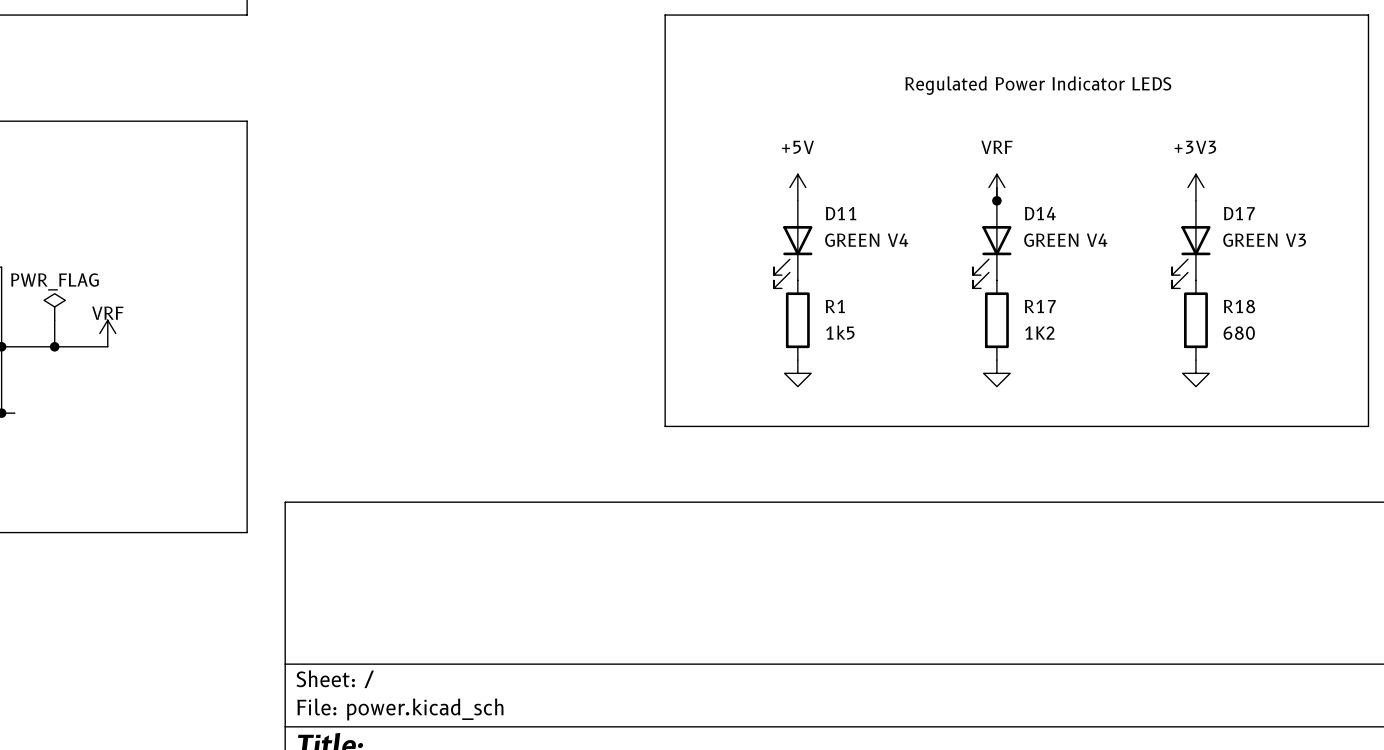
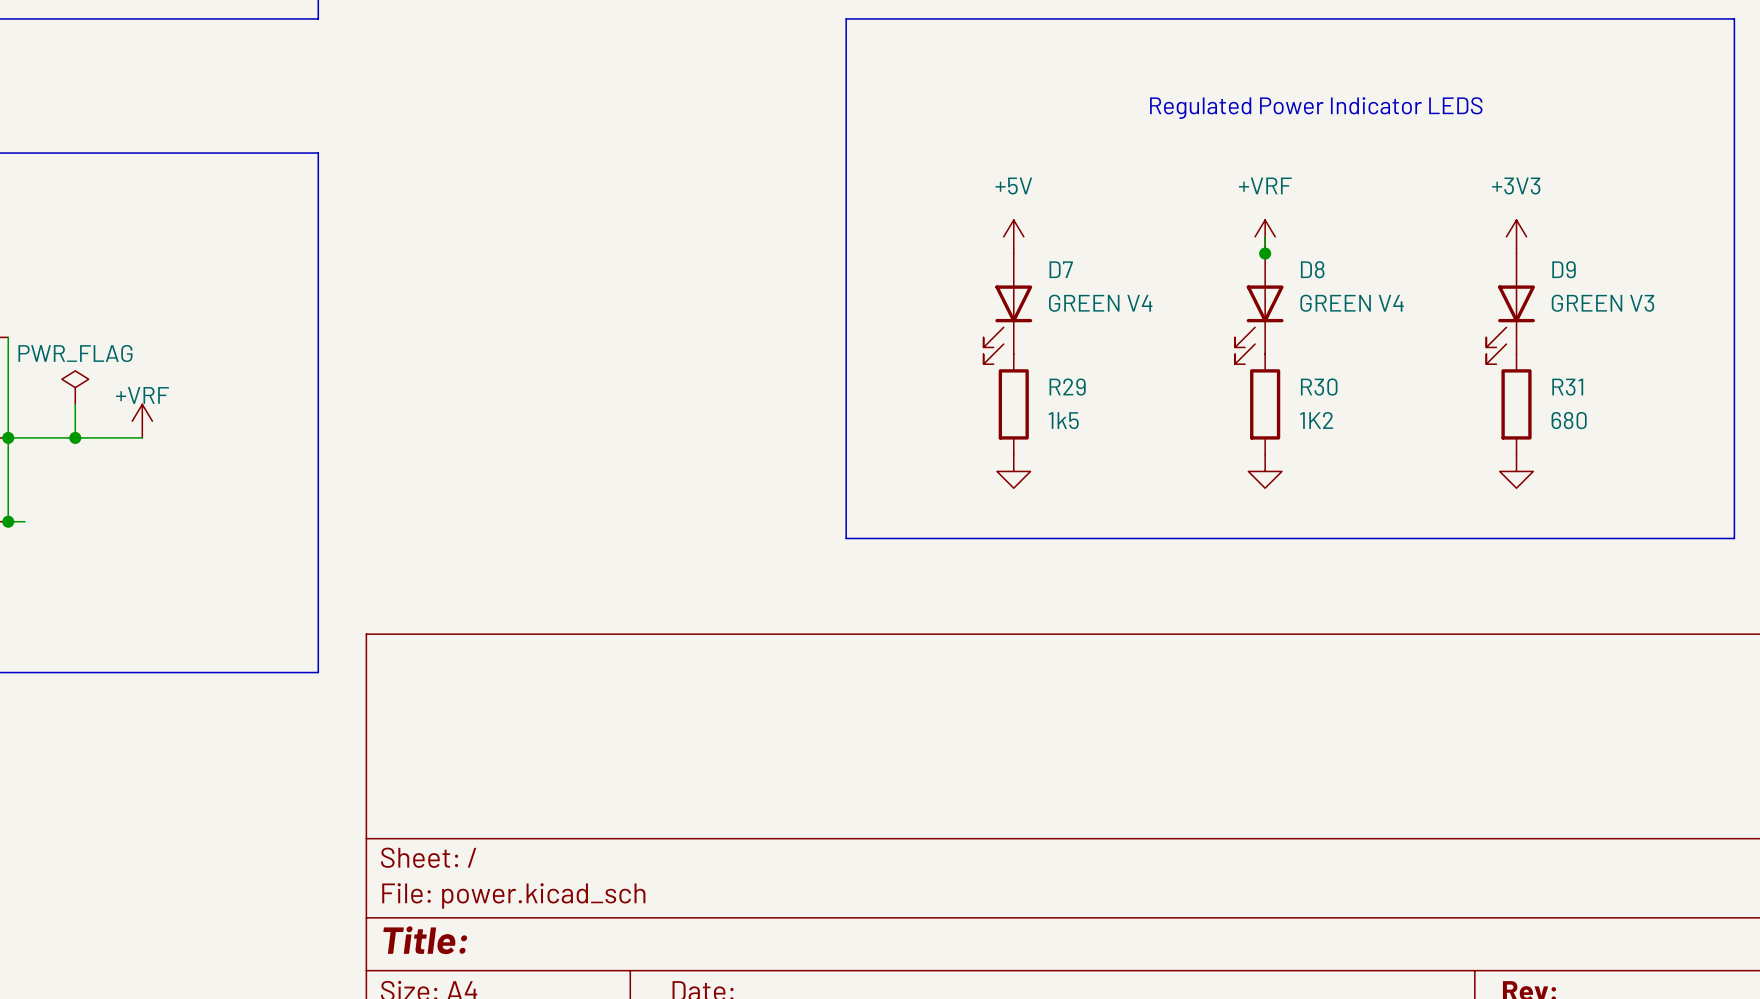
power symbol: VRF (996, 187) -> +VRF (1265, 236)
D11 name: D11 (841, 213) -> D7 (1061, 269)
D14 name: D14 (1040, 213) -> D8 (1312, 269)
D17 name: D17 (1239, 213) -> D9 (1564, 269)
R1 name: R1 (835, 306) -> R29 (1067, 387)
R17 name: R17 (1040, 306) -> R30 (1319, 387)
R18 name: R18 (1239, 306) -> R31 (1567, 387)
power symbol: VRF (107, 333) -> +VRF (142, 421)

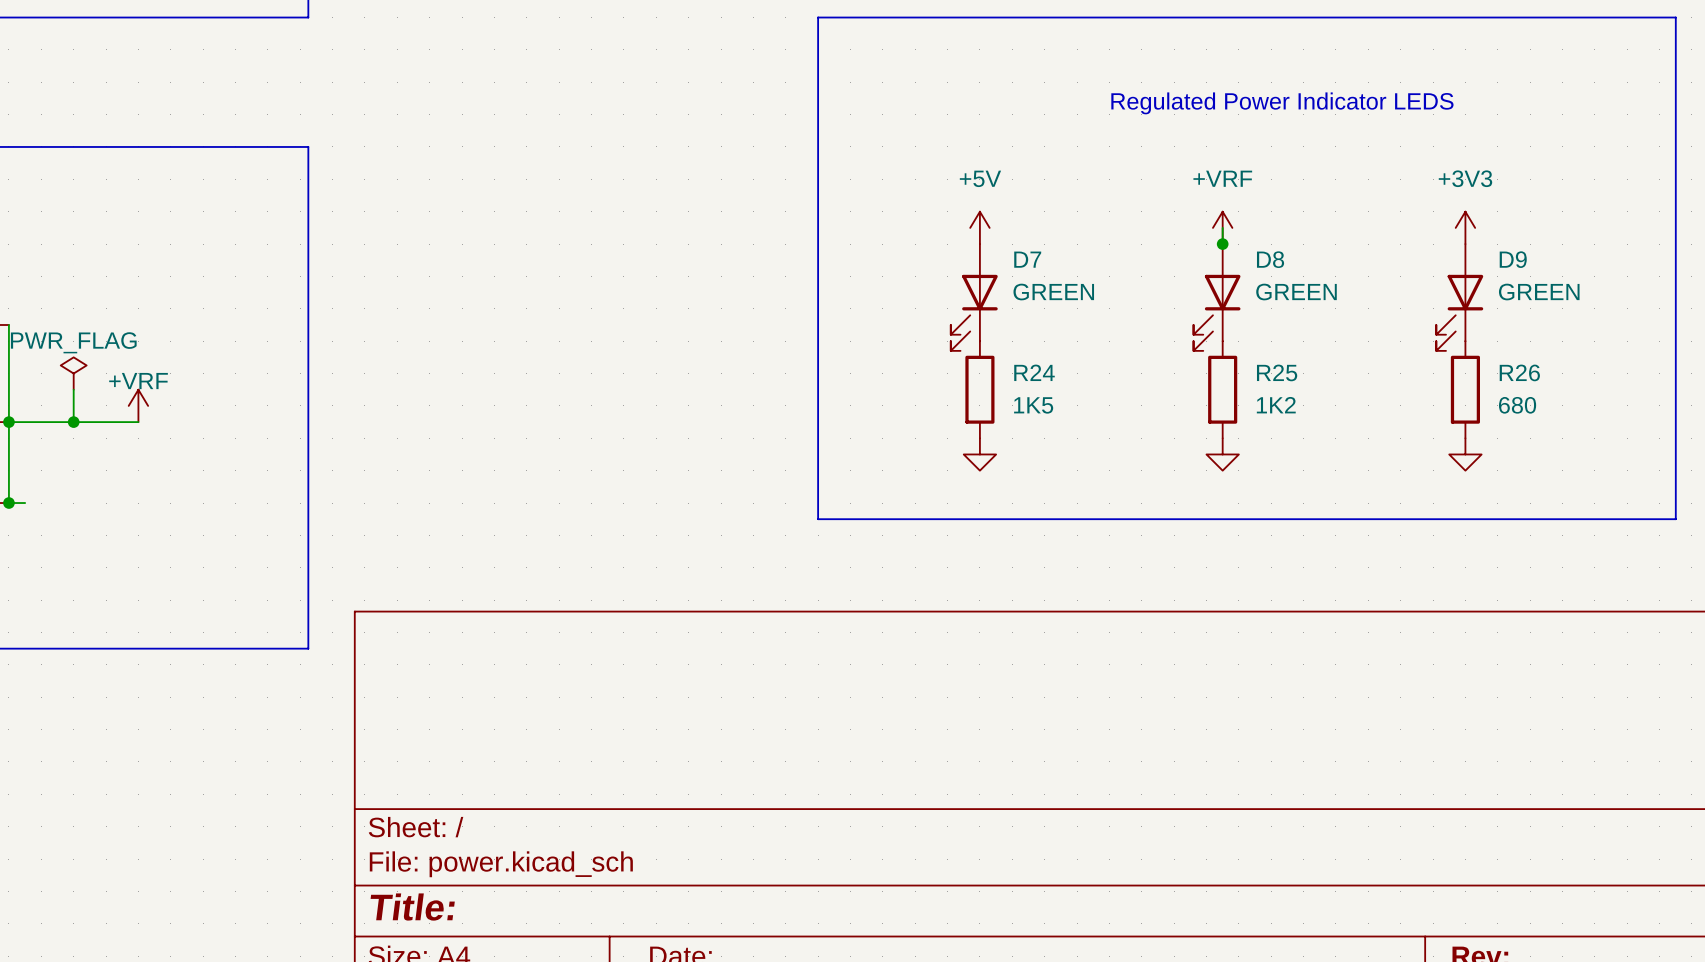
D7 value: GREEN V4 (1100, 303) -> GREEN (1053, 292)
D8 value: GREEN V4 (1352, 303) -> GREEN (1296, 292)
D9 value: GREEN V3 (1602, 303) -> GREEN (1539, 292)
R29 name: R29 (1067, 387) -> R24 (1034, 372)
R30 name: R30 (1319, 387) -> R25 (1277, 372)
R31 name: R31 (1567, 387) -> R26 (1519, 372)
R29 value: 1k5 (1063, 420) -> 1K5 (1033, 405)

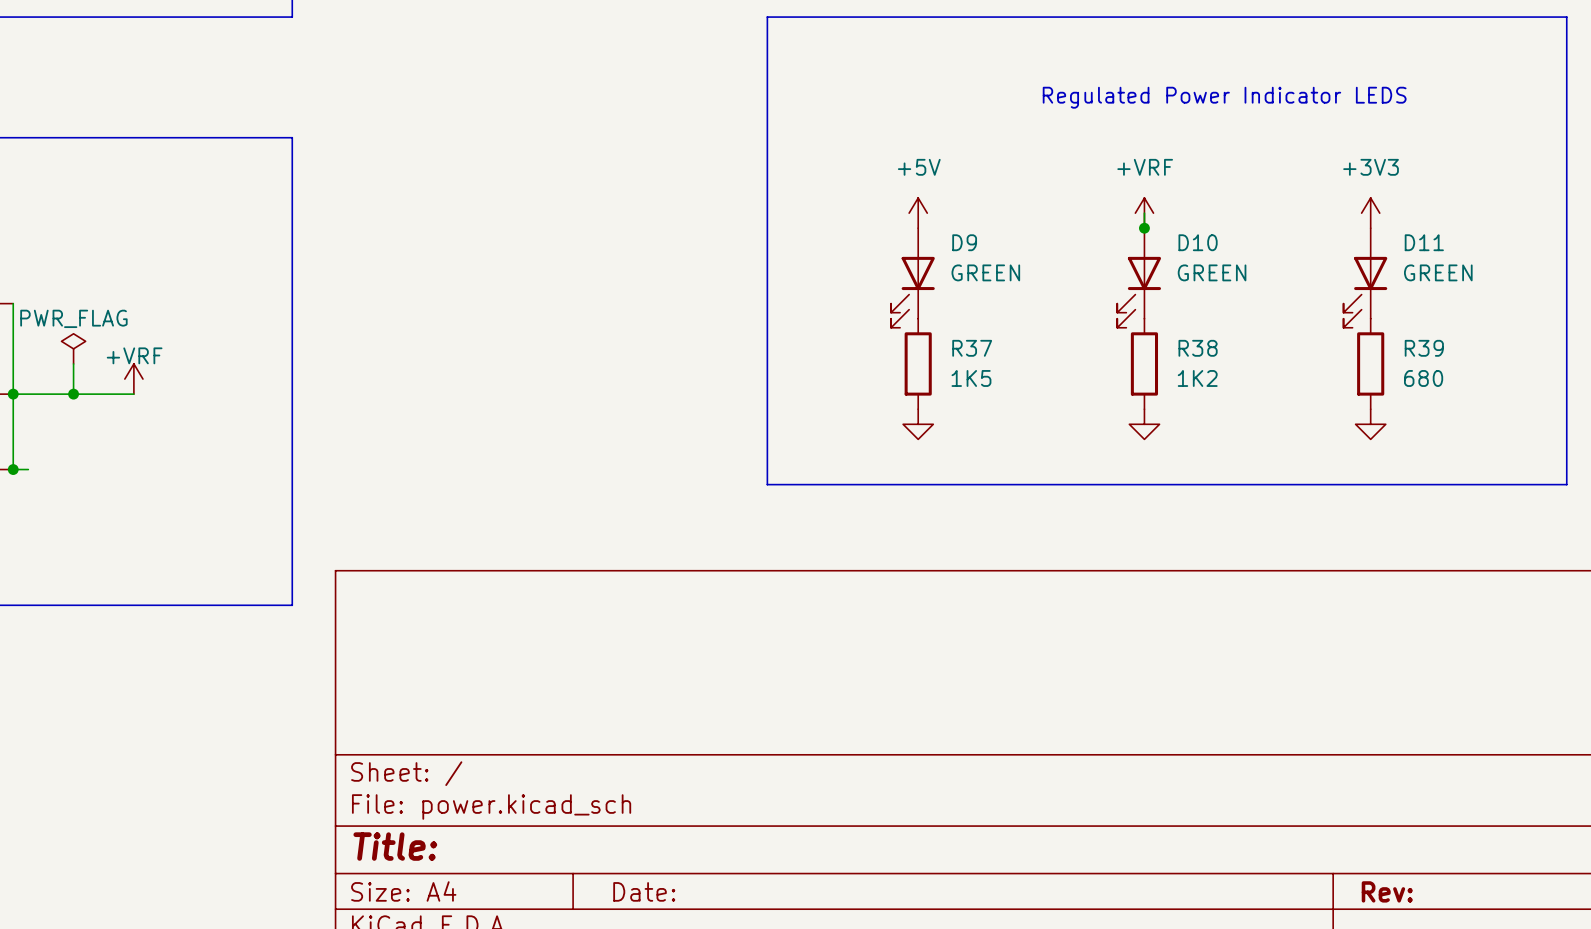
D7 name: D7 (1027, 259) -> D9 (964, 242)
D8 name: D8 (1270, 259) -> D10 (1198, 242)
D9 name: D9 (1513, 259) -> D11 (1424, 242)
R24 name: R24 (1034, 372) -> R37 (972, 348)
R25 name: R25 (1277, 372) -> R38 (1198, 348)
R26 name: R26 (1519, 372) -> R39 (1424, 348)

